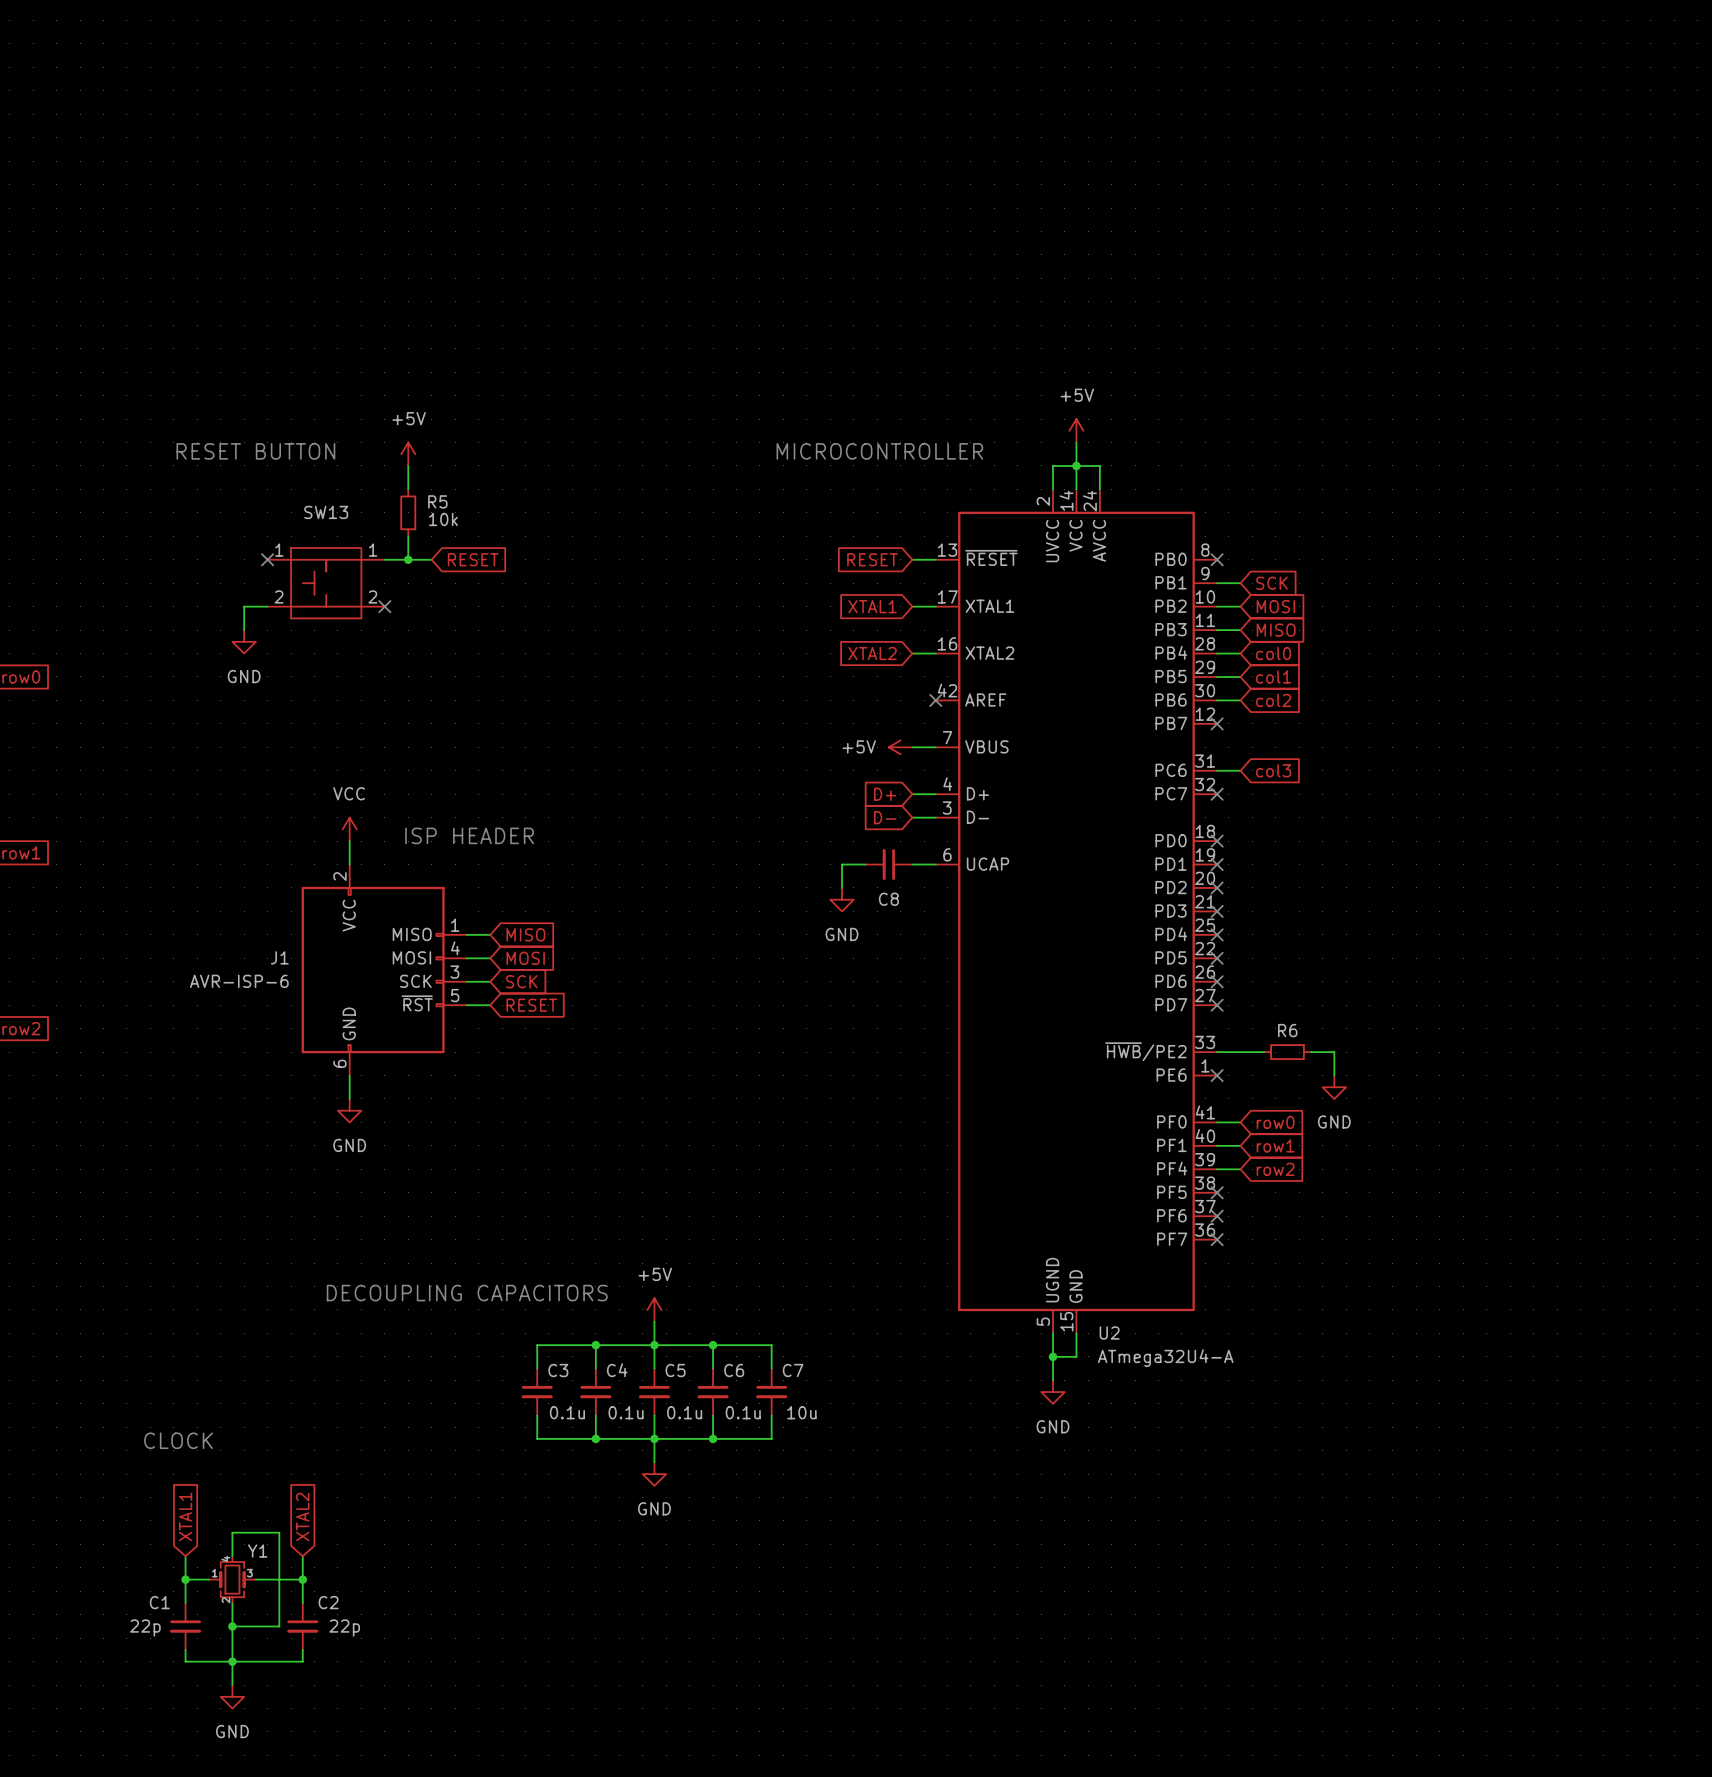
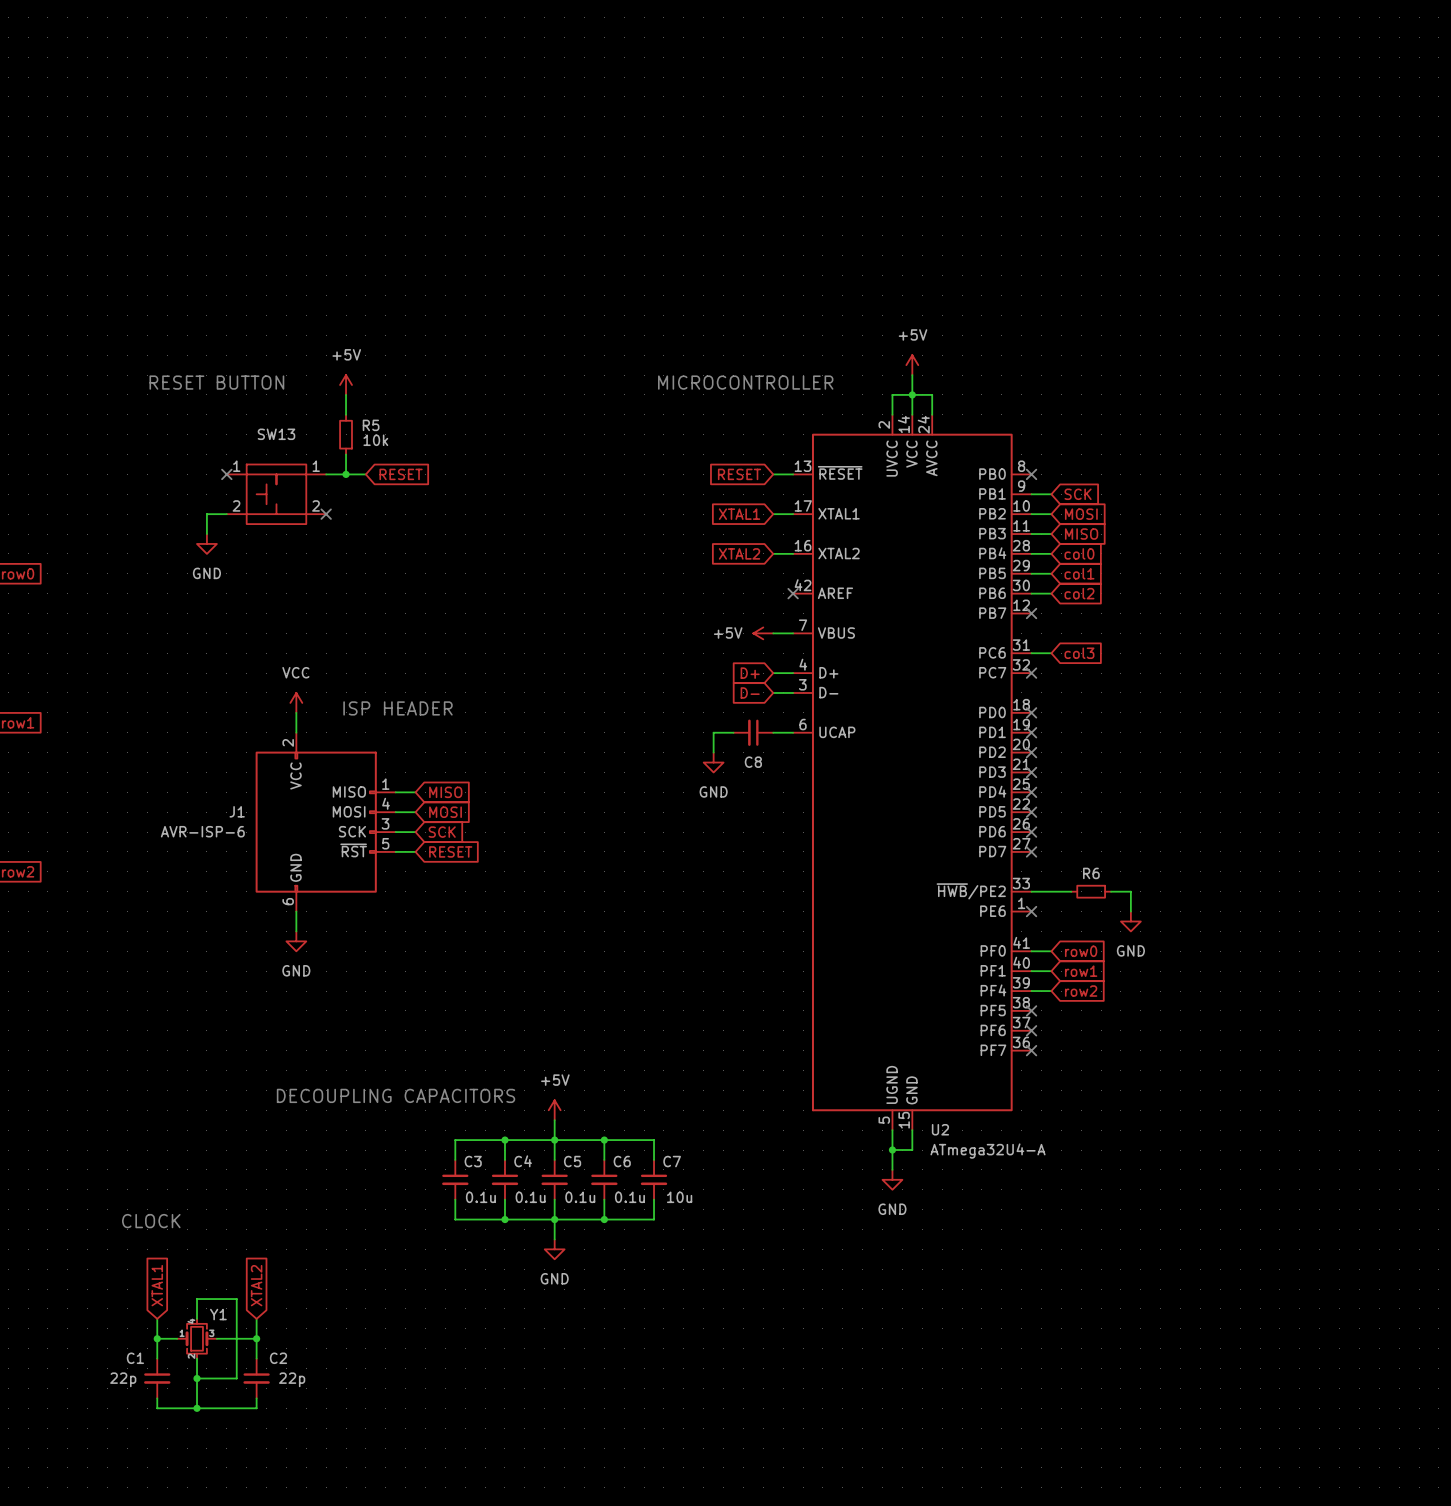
wire: (232, 1661) (232, 1685) -> none
power symbol: GND (232, 1696) -> none

